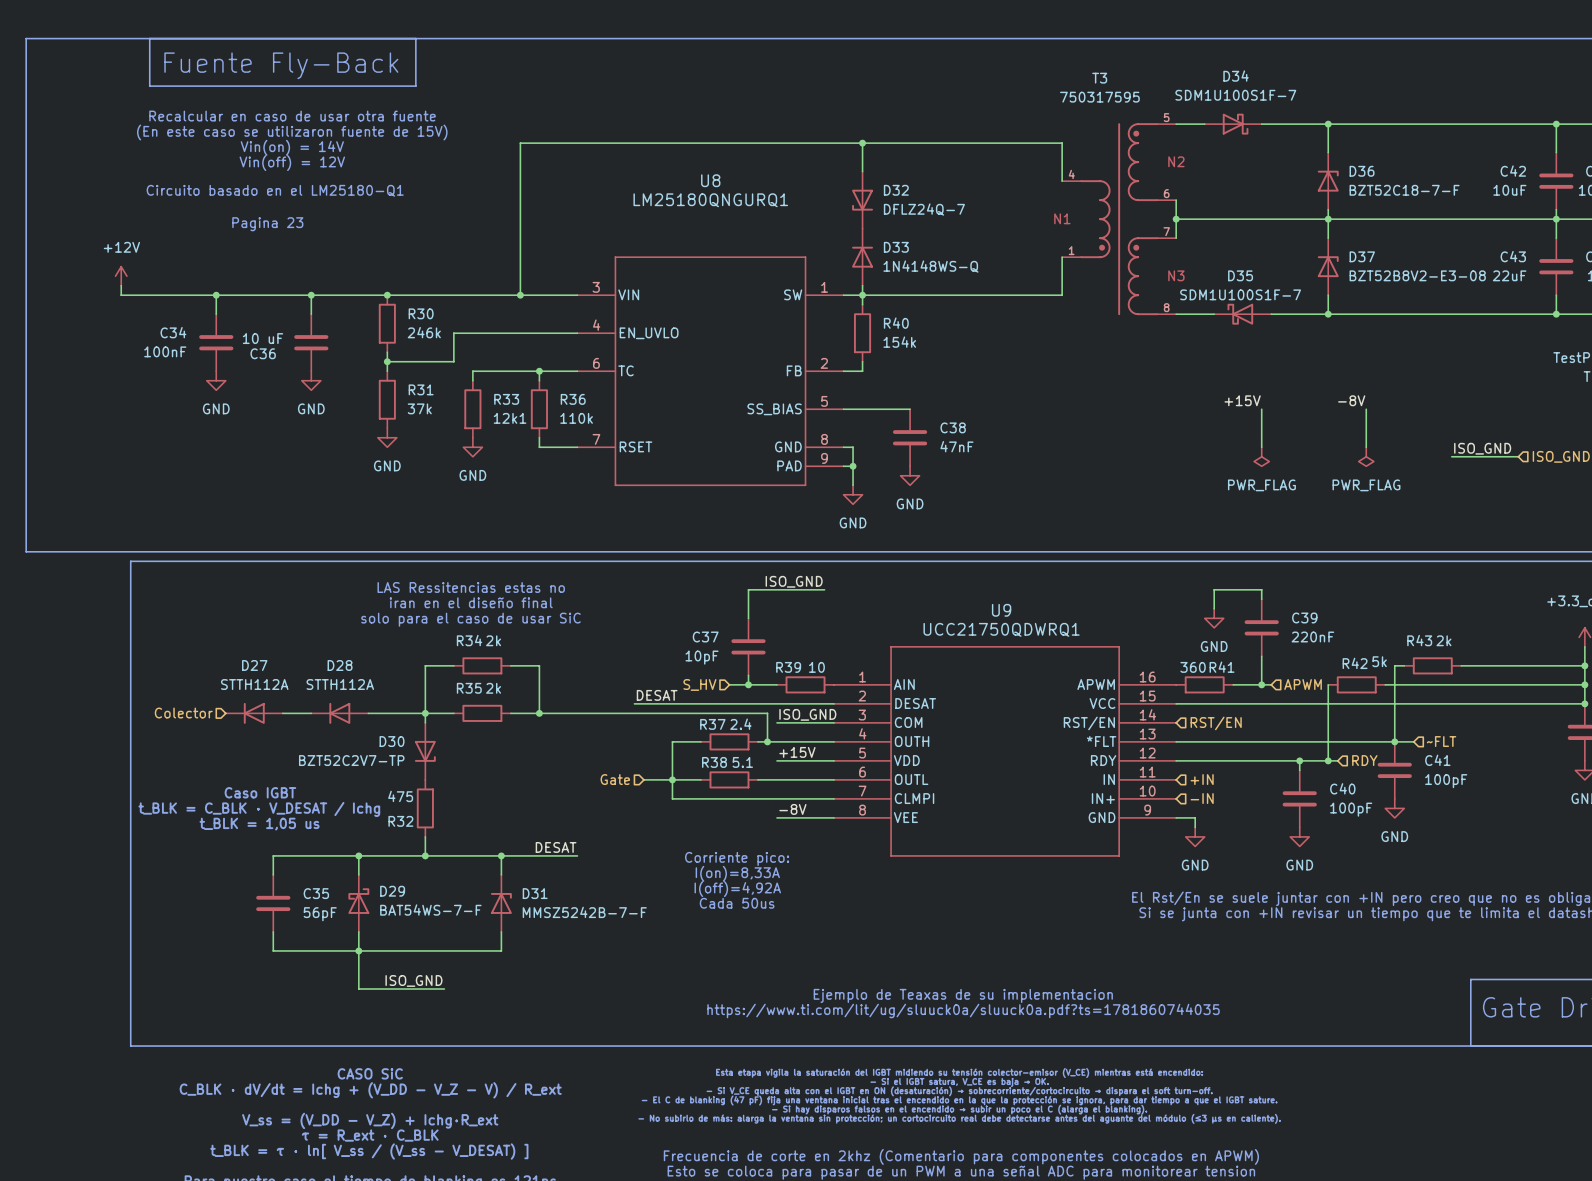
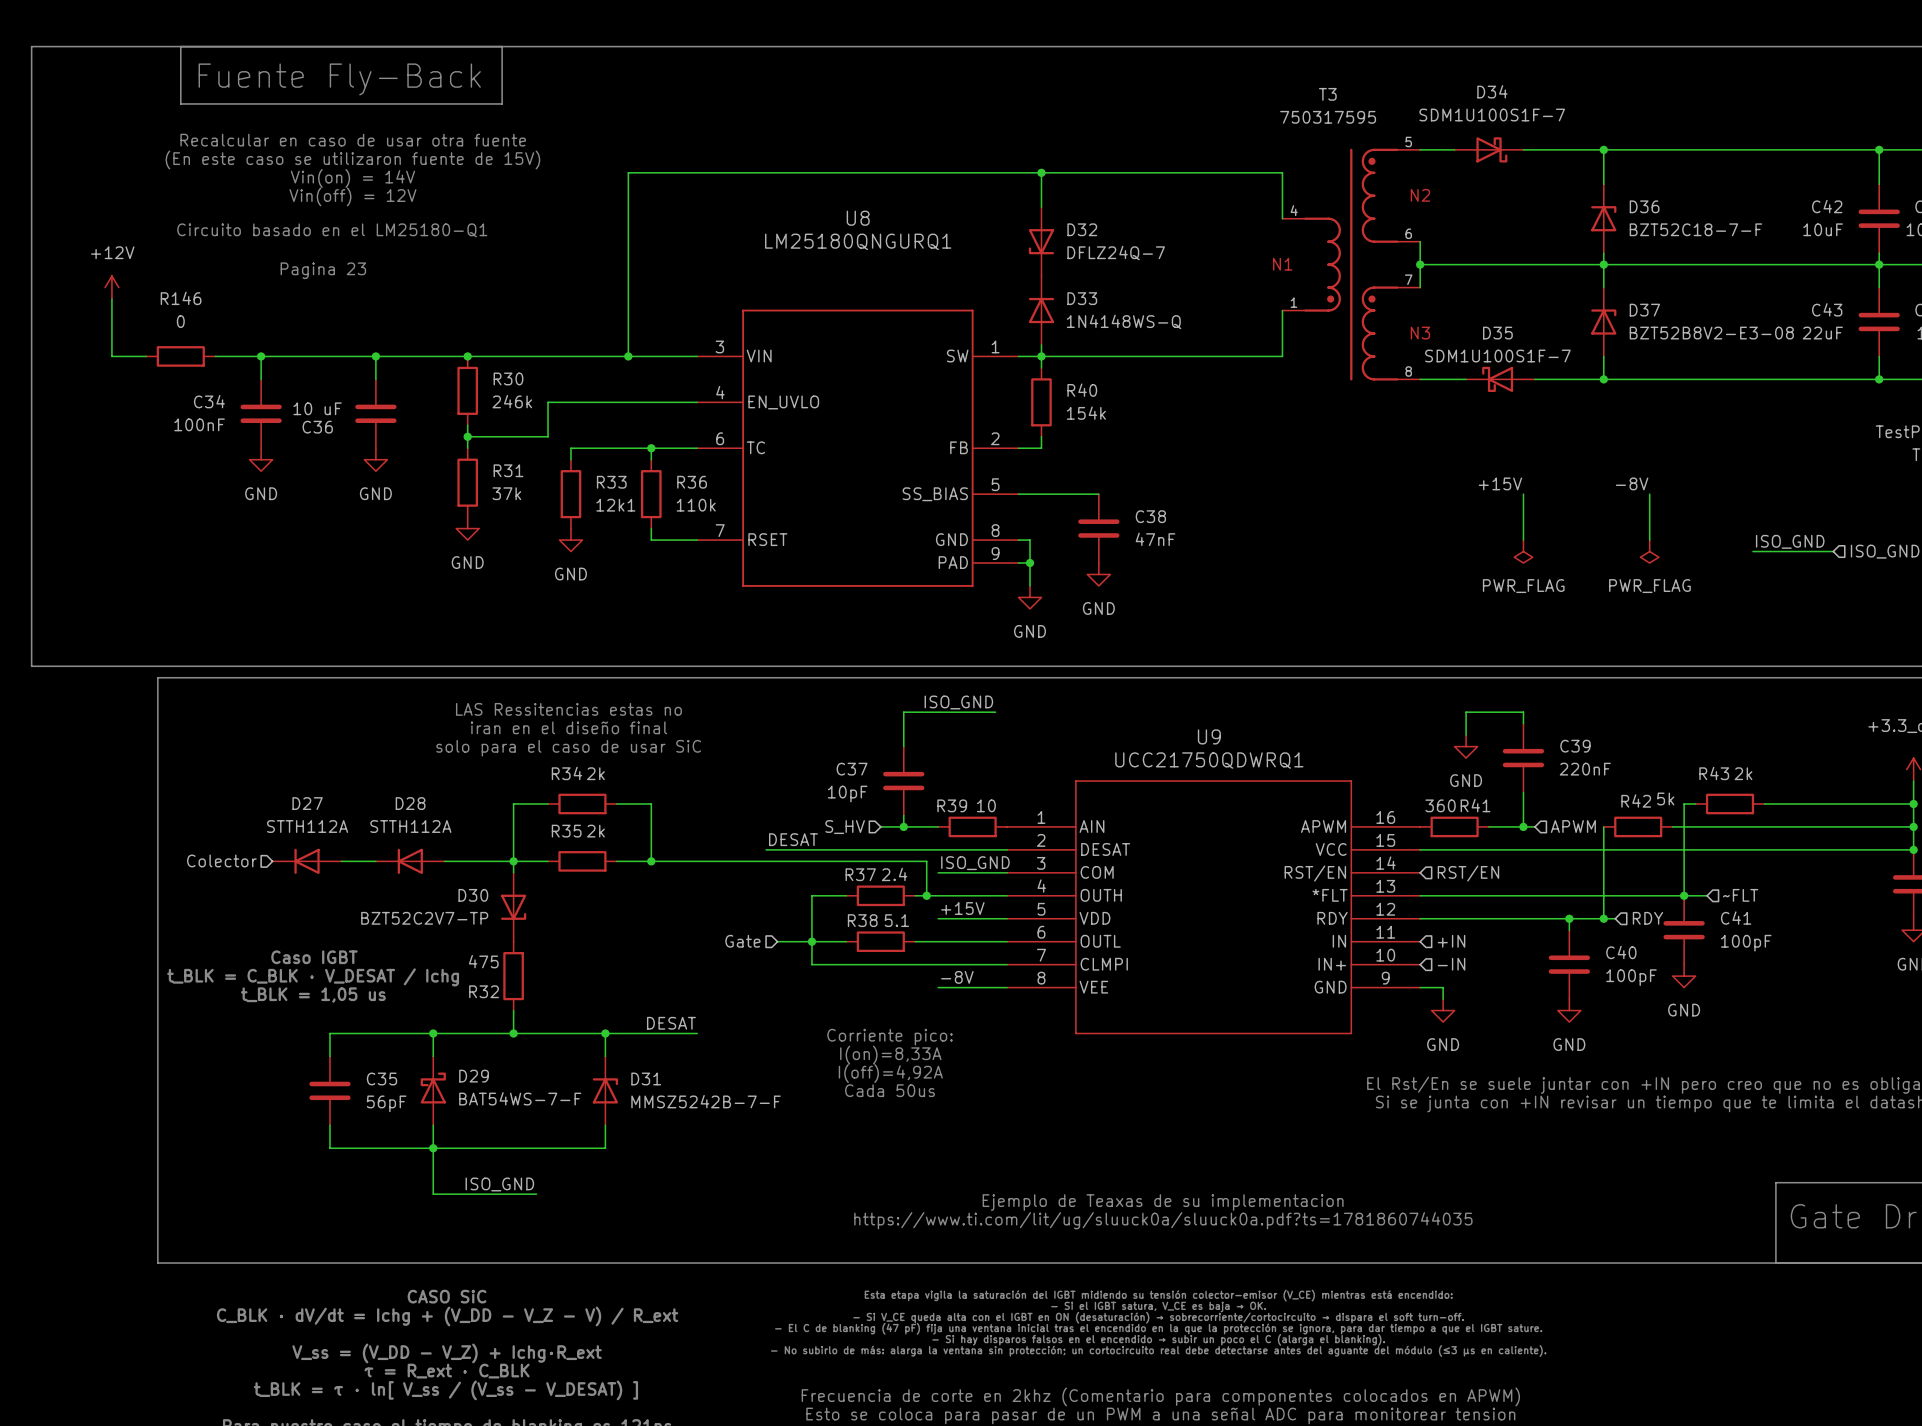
wire: none -> (111, 299) (111, 356) (146, 356)
power symbol position: +12V (121, 276) -> +12V (111, 287)
wire: (121, 285) (121, 295) (178, 295) -> none
R146: none -> 0 (180, 356)

